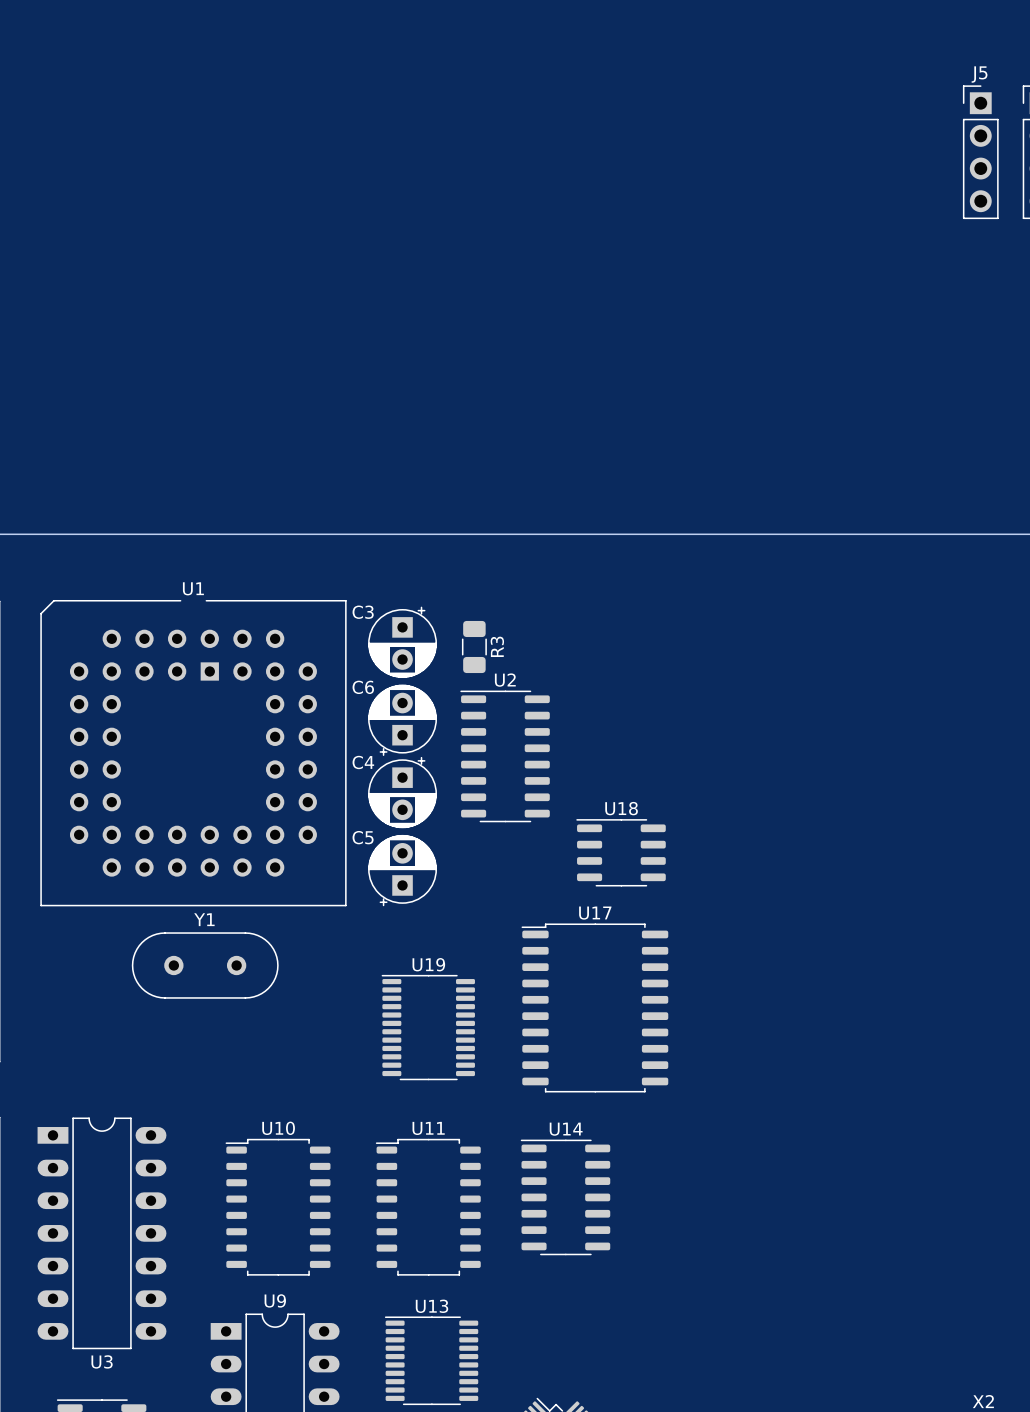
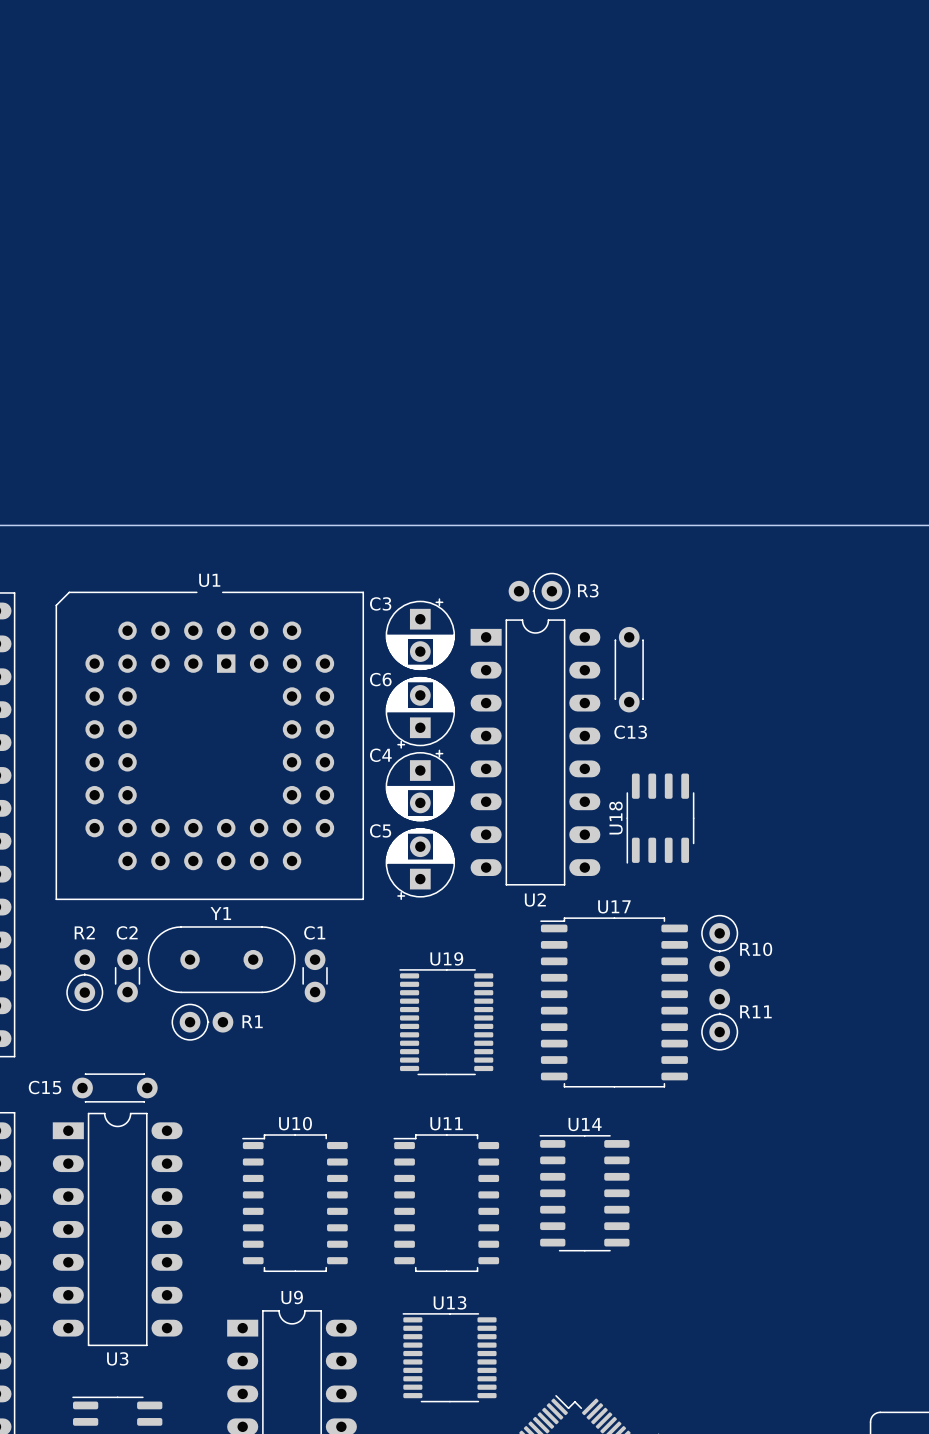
R3 footprint: [461, 620, 487, 674] -> [508, 572, 571, 610]
C13: none -> (629, 669)
U2 name position: U2 (505, 680) -> U2 (535, 900)
U2 footprint: [460, 690, 550, 823] -> [470, 619, 601, 886]
U18 rotation: 0° (621, 852) -> 90° counterclockwise (660, 818)
R10: none -> (719, 945)
C2: none -> (127, 975)
C1: none -> (315, 975)
R2: none -> (84, 980)
R11: none -> (719, 1019)
R1: none -> (202, 1022)
C15: none -> (114, 1087)

